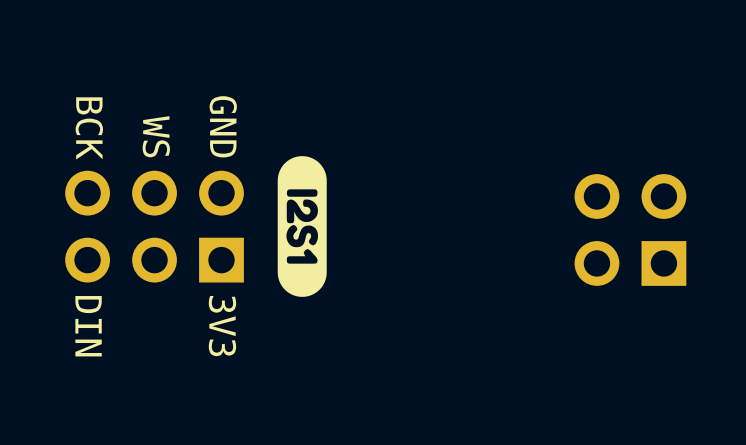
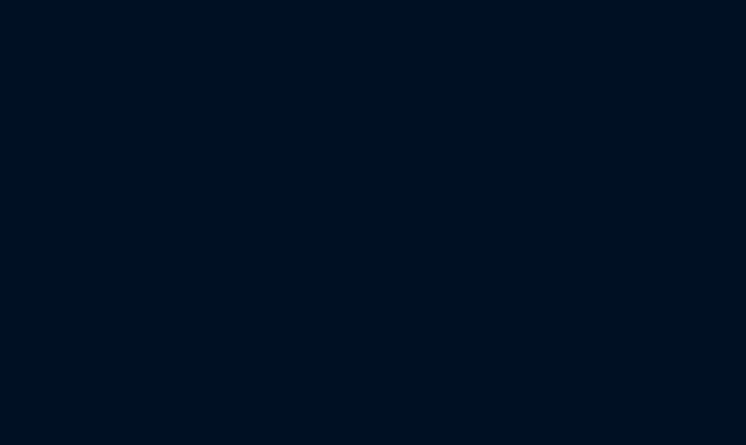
text: GND (223, 126) -> none
text: BCK (89, 128) -> none
text: WS (156, 136) -> none
drawing: [277, 156, 327, 297] -> none
part: (154, 226) -> none
part: (630, 229) -> none
text: DIN (88, 326) -> none
text: 3V3 (222, 326) -> none

